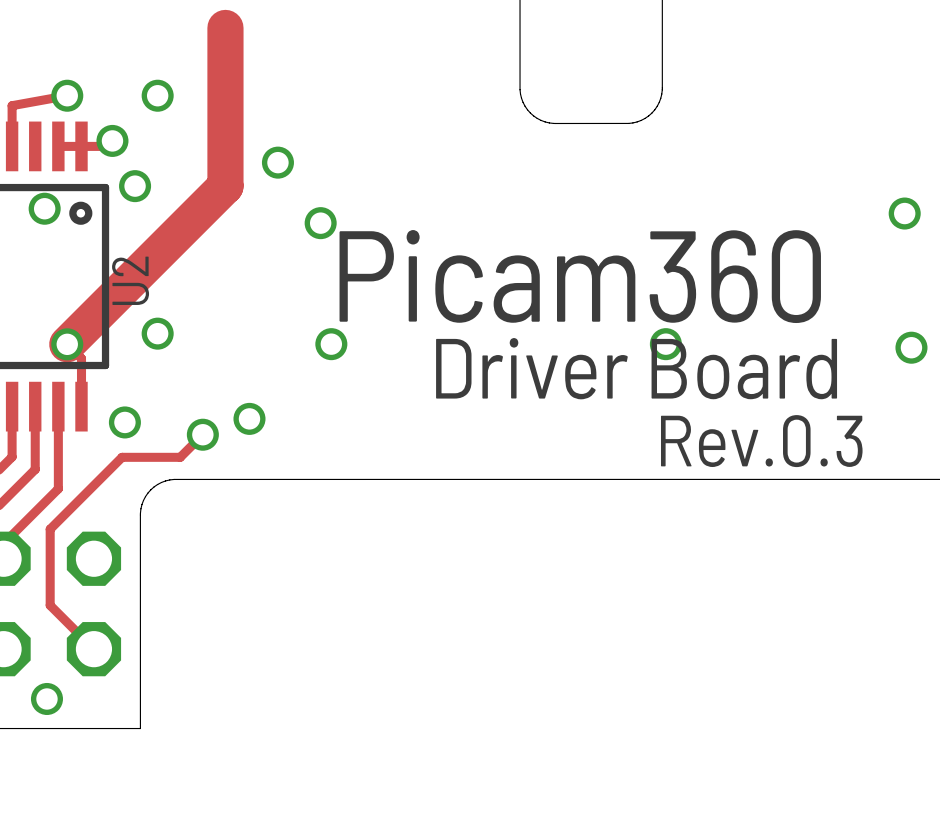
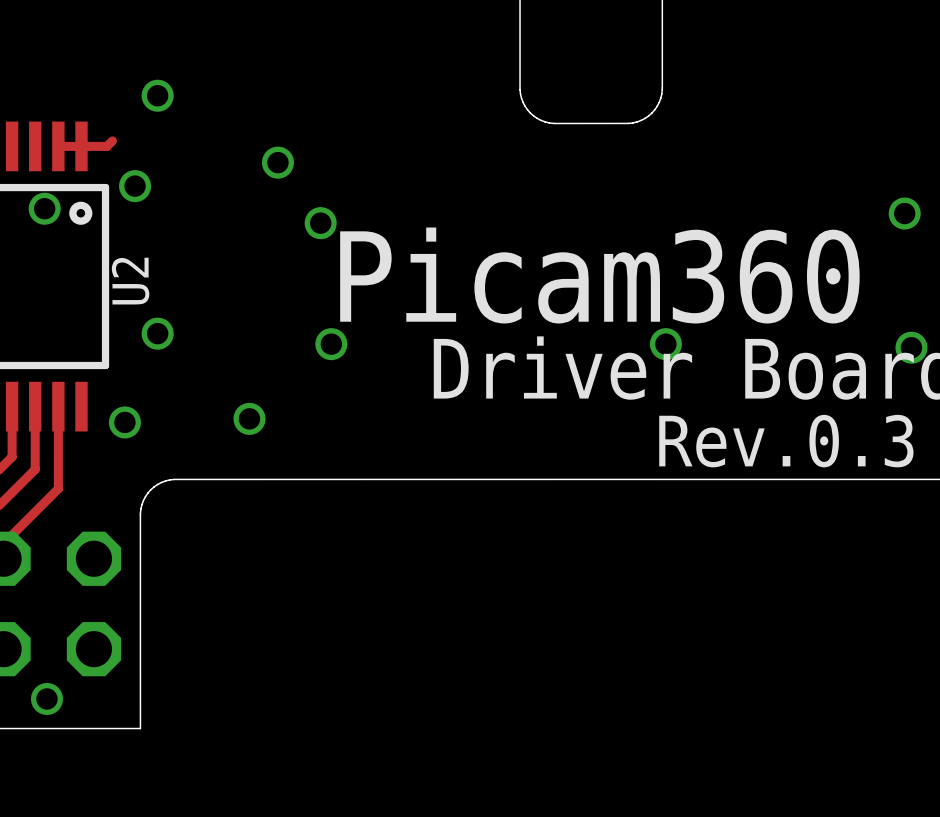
track: (225, 27) (225, 186) (67, 344) (81, 358) (81, 406) -> none
track: (67, 95) (12, 105) (12, 146) -> none
via: (67, 95) -> none
via: (112, 140) -> none
via: (67, 344) -> none
track: (202, 434) (180, 457) (122, 457) (50, 529) (50, 605) (93, 649) -> none
via: (202, 434) -> none

